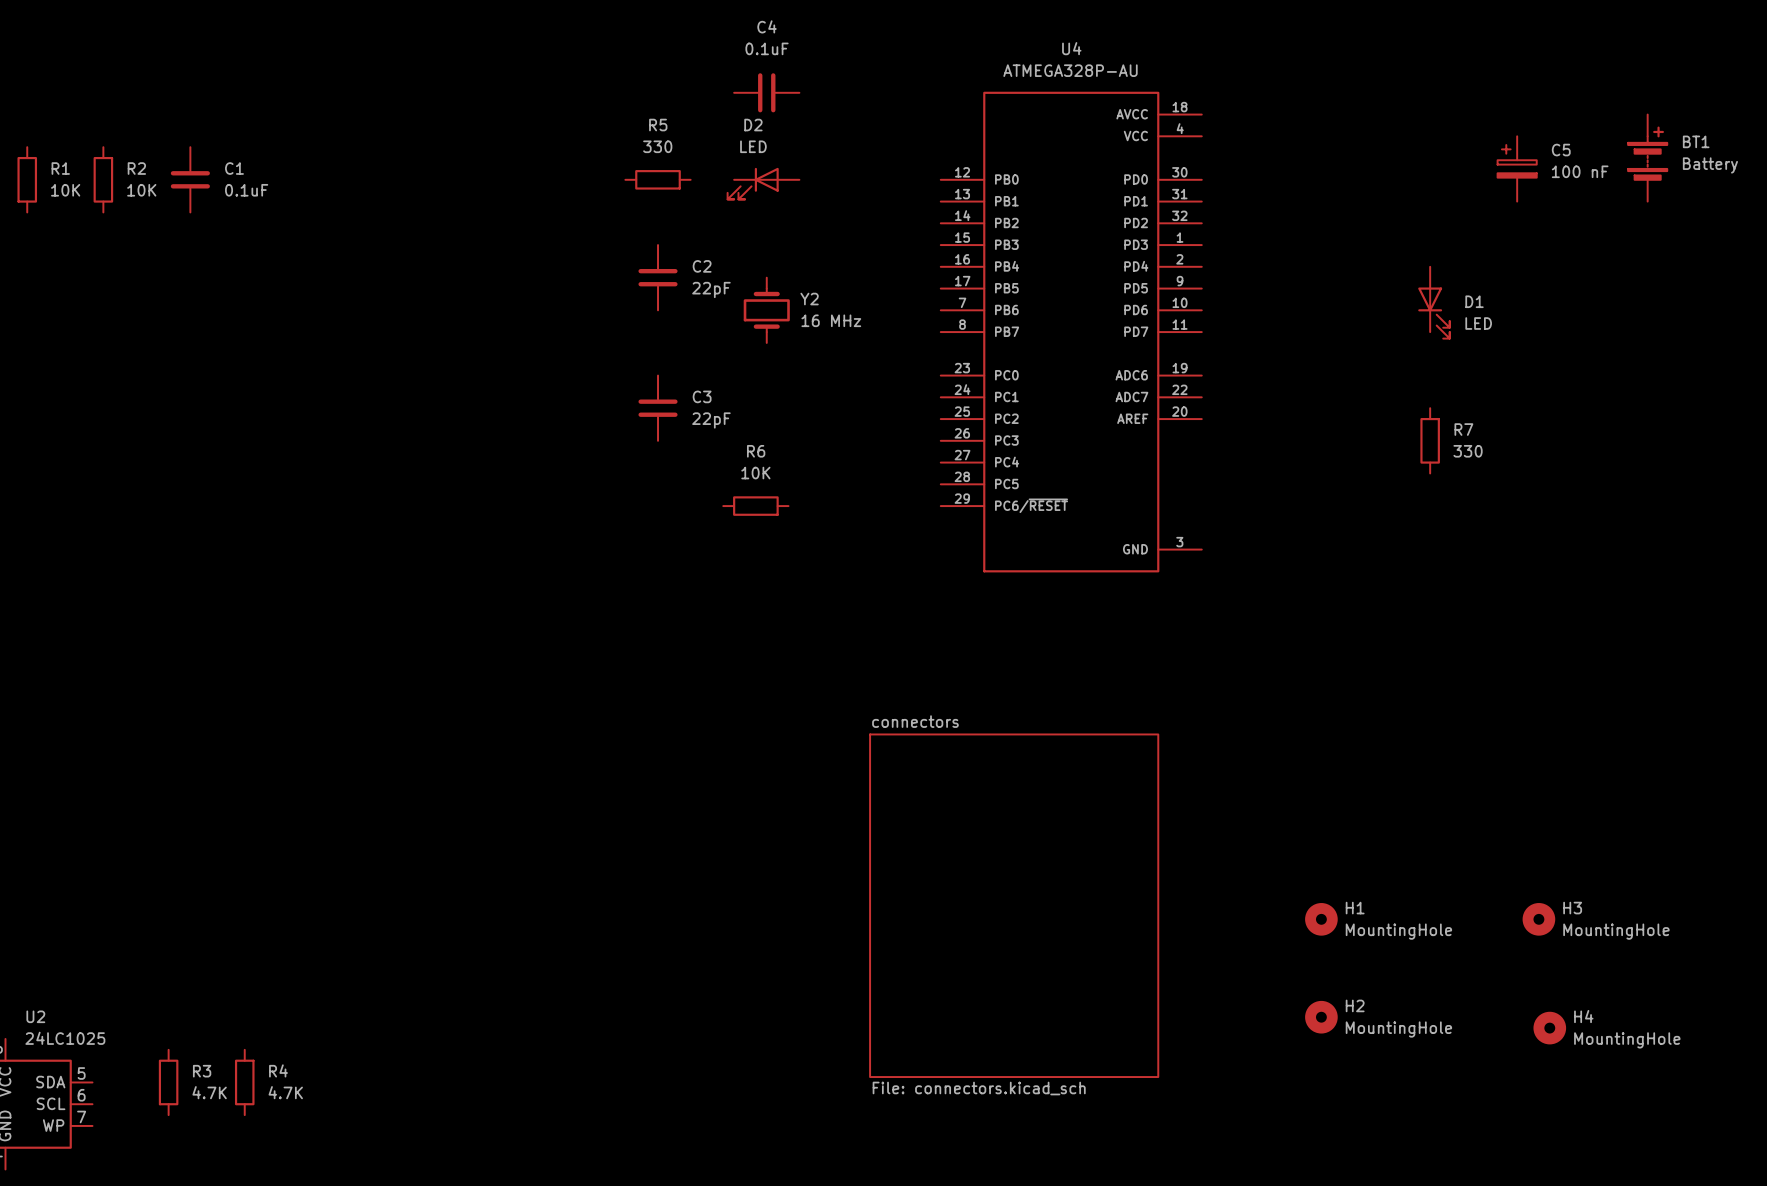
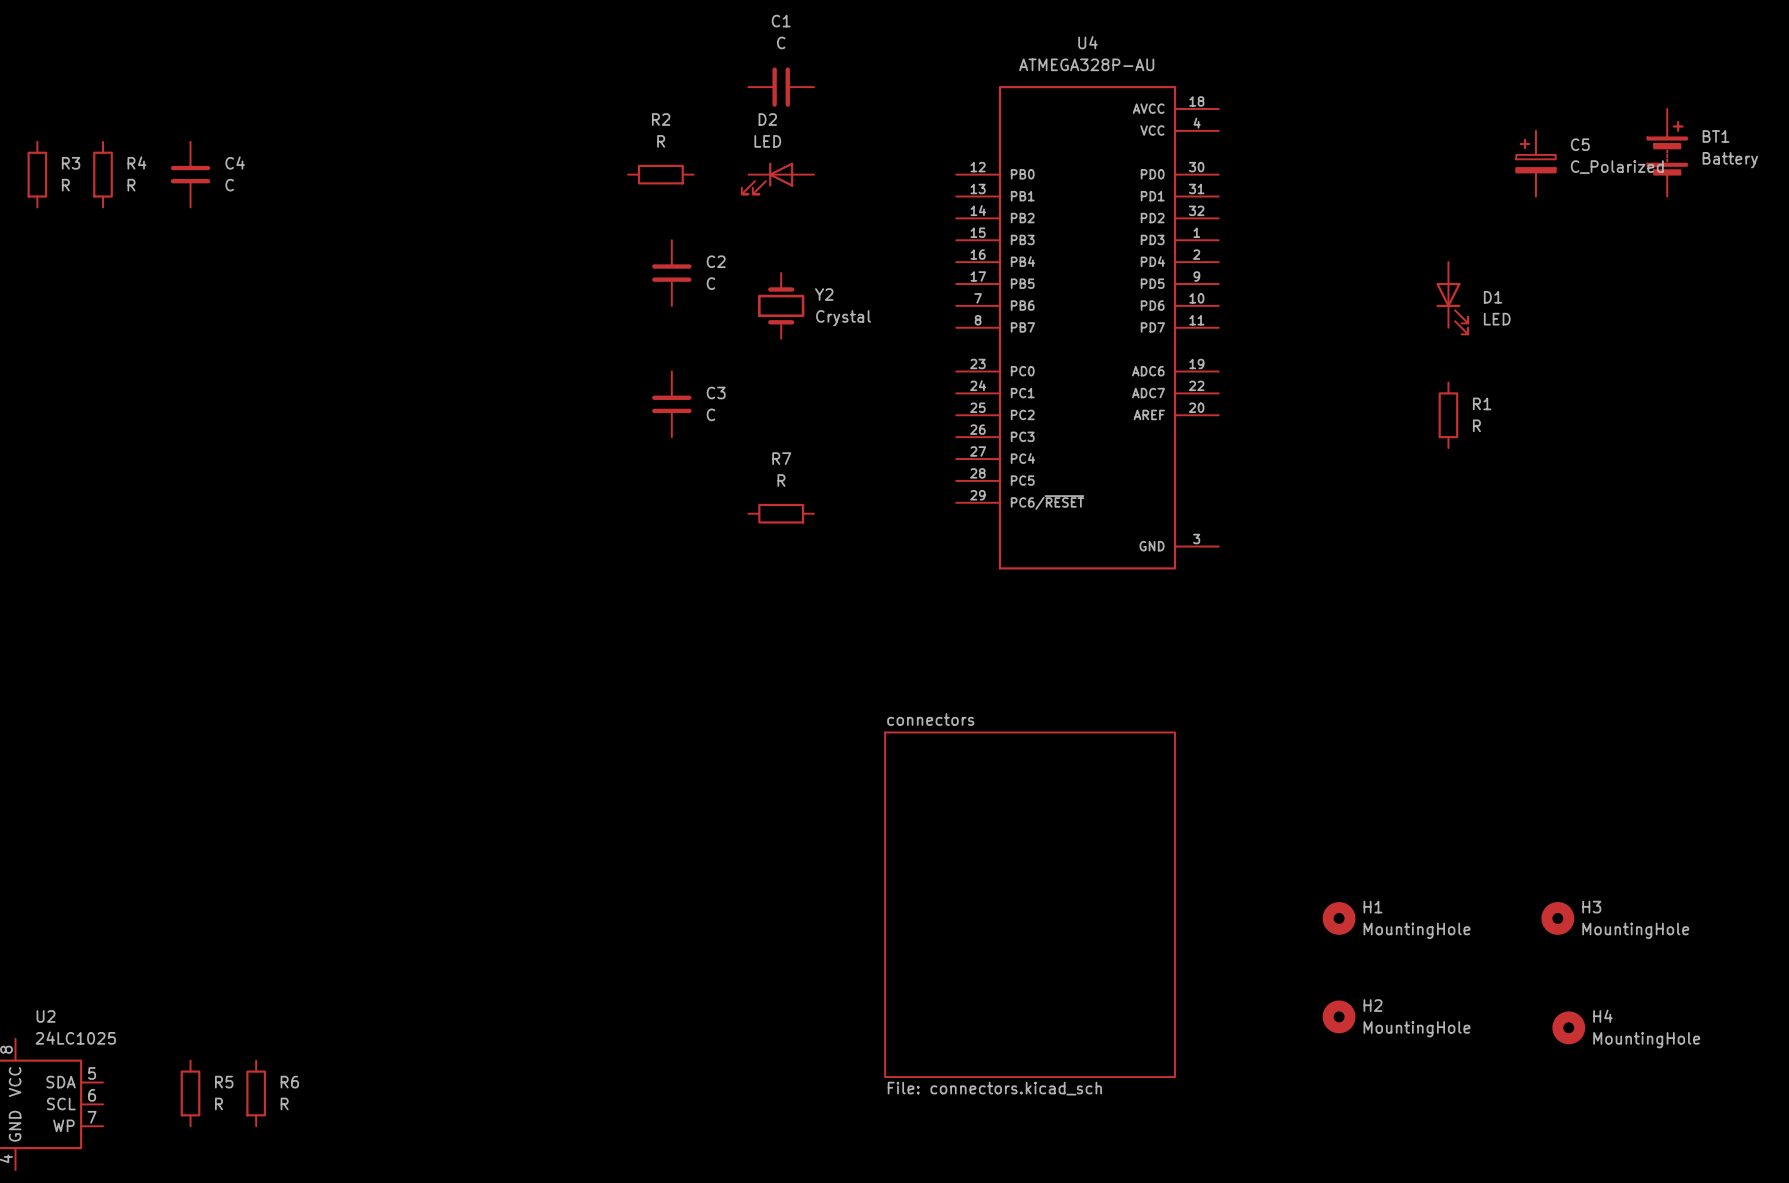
C4 name: C4 (767, 26) -> C1 (781, 21)
C4 value: 0.1uF (767, 48) -> C (781, 42)
R5 name position: R5 (658, 125) -> R5 (224, 1082)
R5 value: 330 (657, 146) -> R (219, 1103)
R1 name: R1 (60, 168) -> R3 (71, 163)
R2 name position: R2 (136, 168) -> R2 (661, 119)
C5 value: 100 nF (1580, 171) -> C_Polarized (1617, 167)
R2 rotation: 0° (103, 179) -> 90° clockwise (660, 174)
R2 position: (103, 179) -> (660, 174)
C4: none -> C (190, 174)
C1: 0.1uF (190, 179) -> none
R5 rotation: 0° (658, 179) -> 90° clockwise (190, 1093)
R5 position: (658, 179) -> (190, 1093)
R1 value: 10K (65, 190) -> R (65, 185)
R2 value: 10K (141, 190) -> R (661, 141)
C2 value: 22pF (711, 289) -> C (710, 283)
Y2 value: 16 MHz (831, 320) -> Crystal (843, 318)
R1: none -> R (1448, 415)
C3 value: 22pF (711, 420) -> C (710, 414)
R7 name position: R7 (1463, 429) -> R7 (781, 458)
R7 rotation: 0° (1430, 440) -> 90° clockwise (781, 513)
R7 position: (1430, 440) -> (781, 513)
R6 name position: R6 (756, 451) -> R6 (289, 1082)
R7 value: 330 (1468, 451) -> R (781, 480)
R6 value: 10K (755, 473) -> R (284, 1103)
R6 rotation: 0° (755, 506) -> 90° clockwise (256, 1093)
R6 position: (755, 506) -> (256, 1093)
R3: 4.7K (168, 1082) -> none
R4 position: (244, 1082) -> (103, 174)
R4 value: 4.7K (285, 1092) -> R (131, 185)

